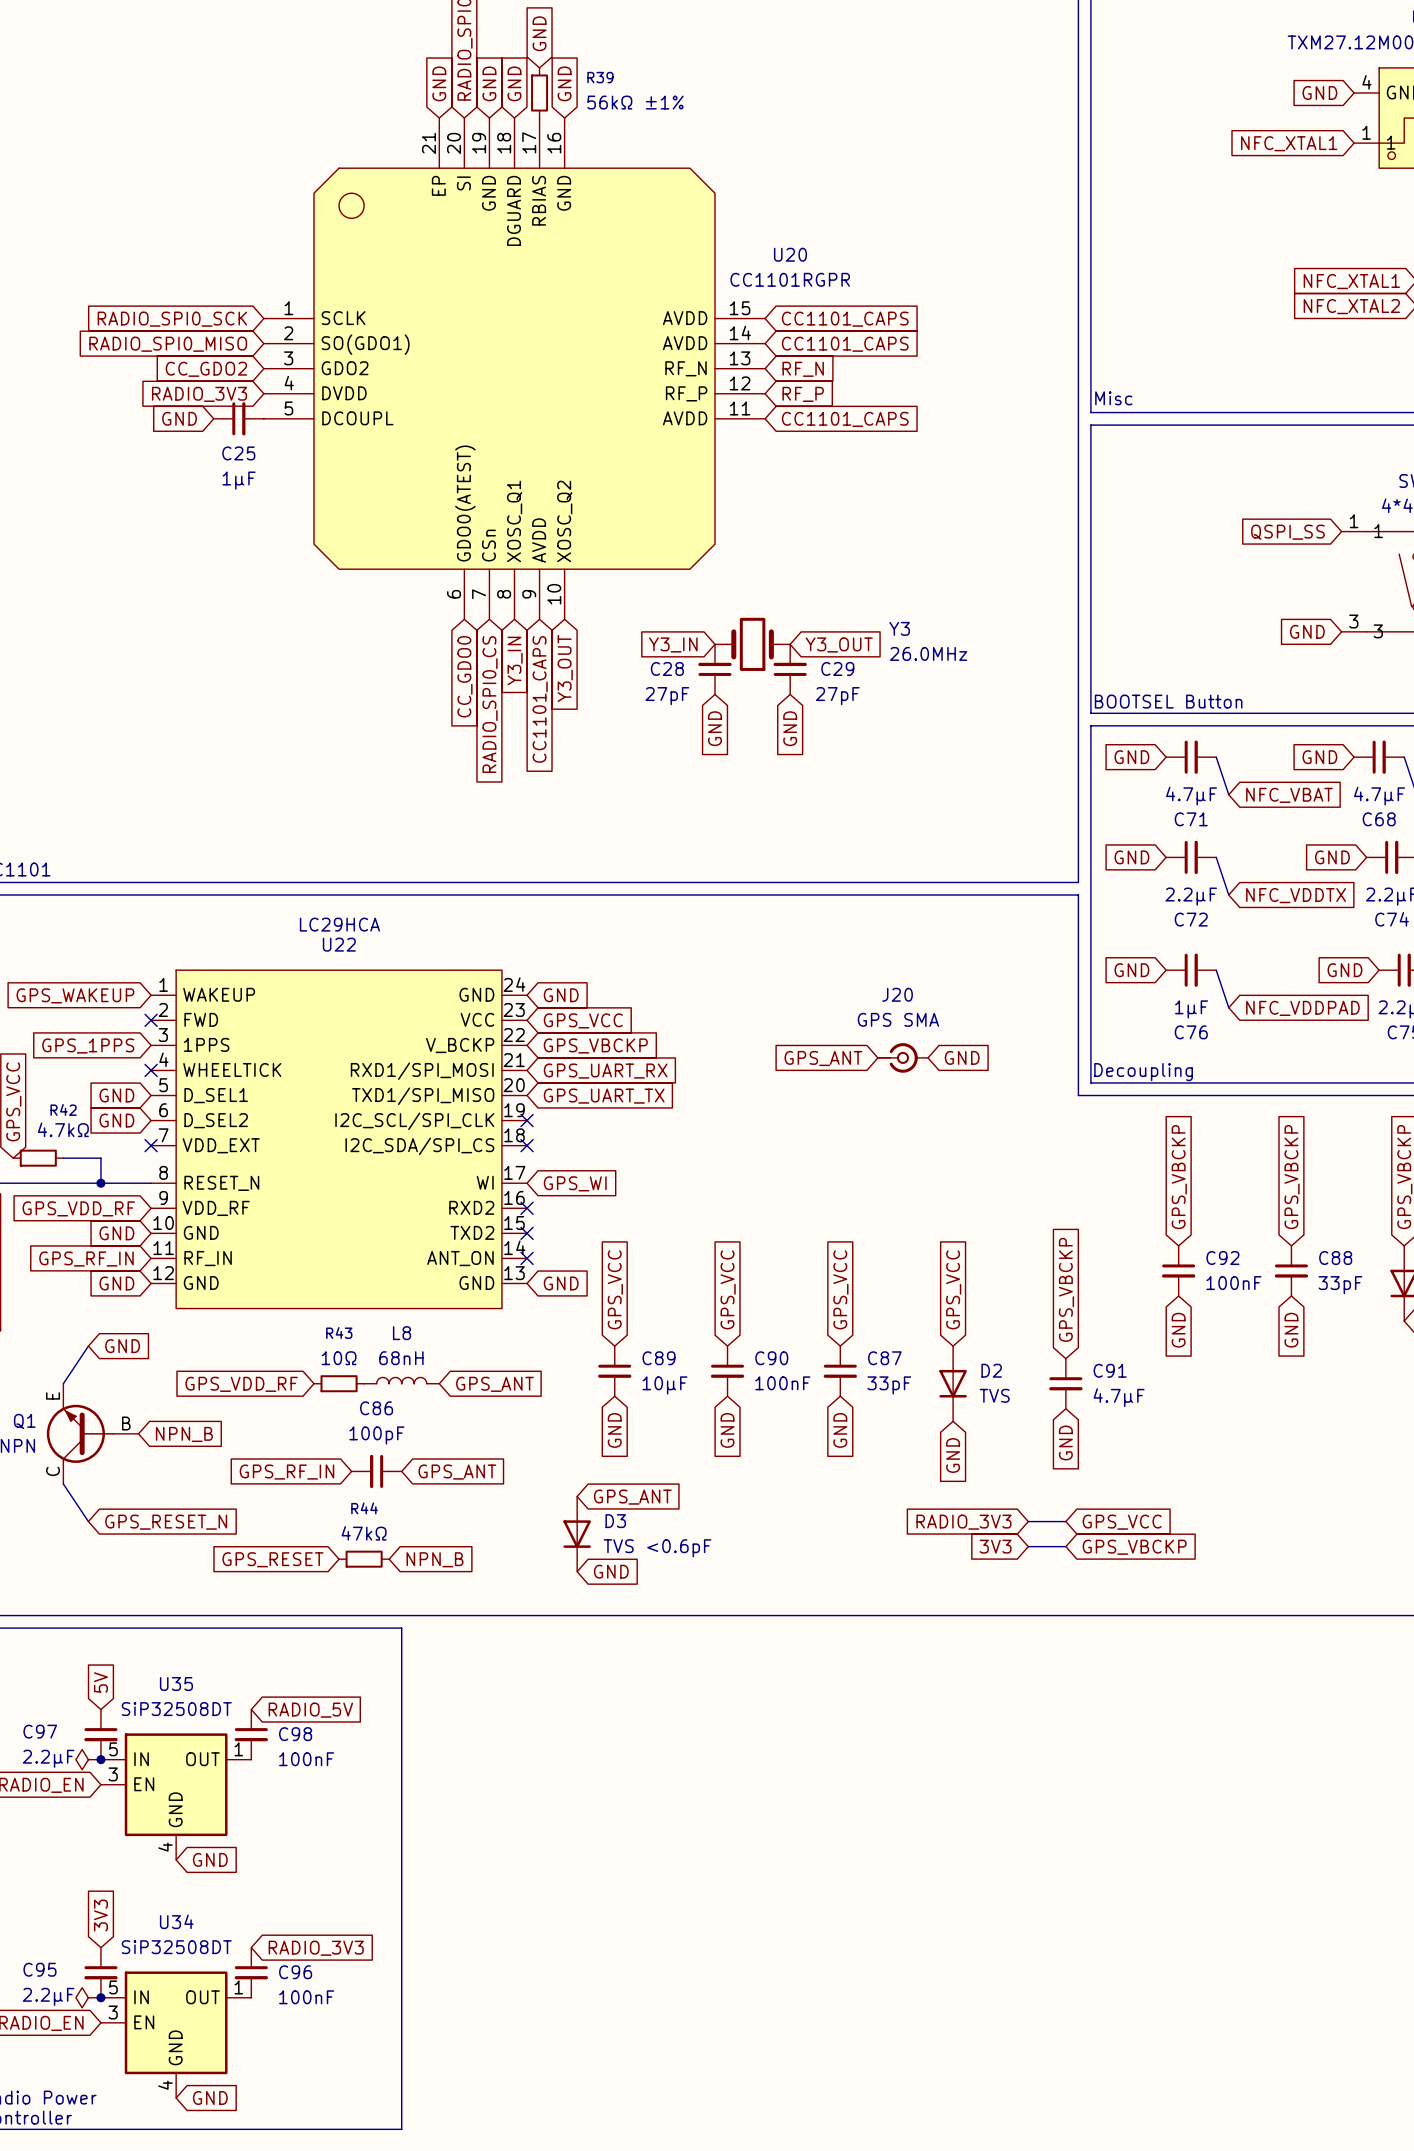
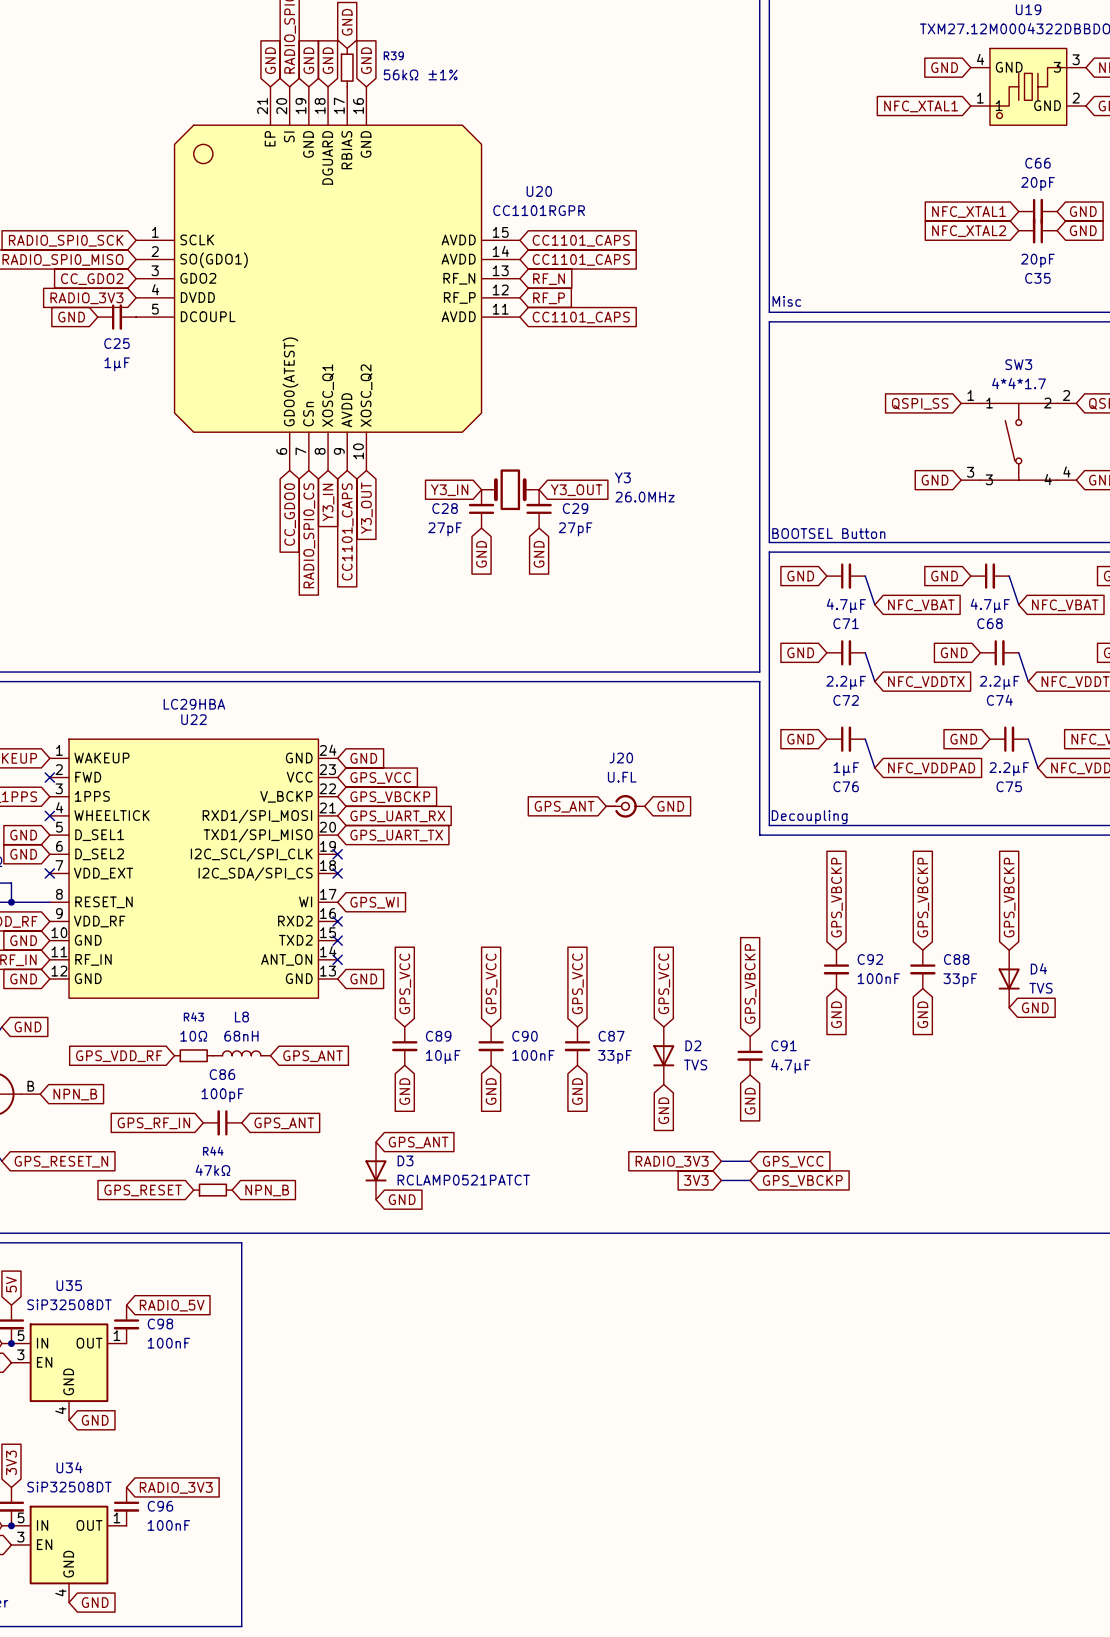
U22 value: LC29HCA (339, 924) -> LC29HBA (194, 704)
J20 value: GPS SMA (898, 1019) -> U.FL (622, 777)
D3 value: TVS <0.6pF (657, 1548) -> RCLAMP0521PATCT (463, 1180)

